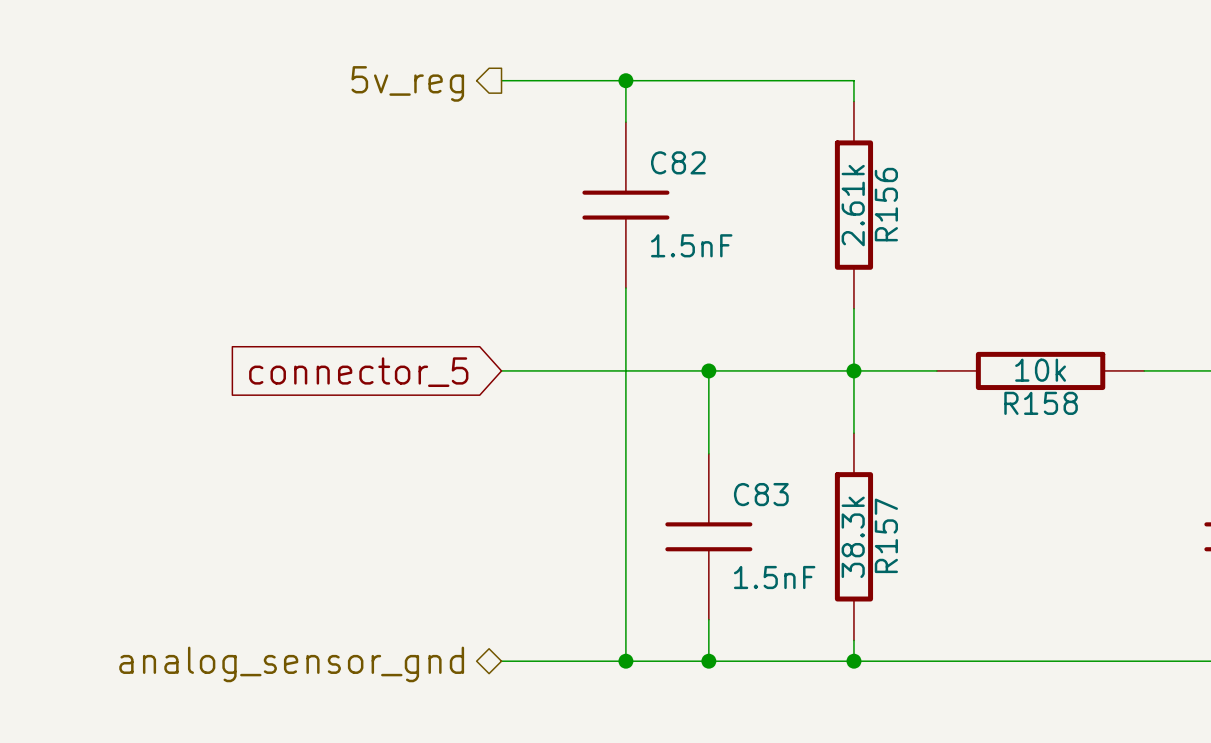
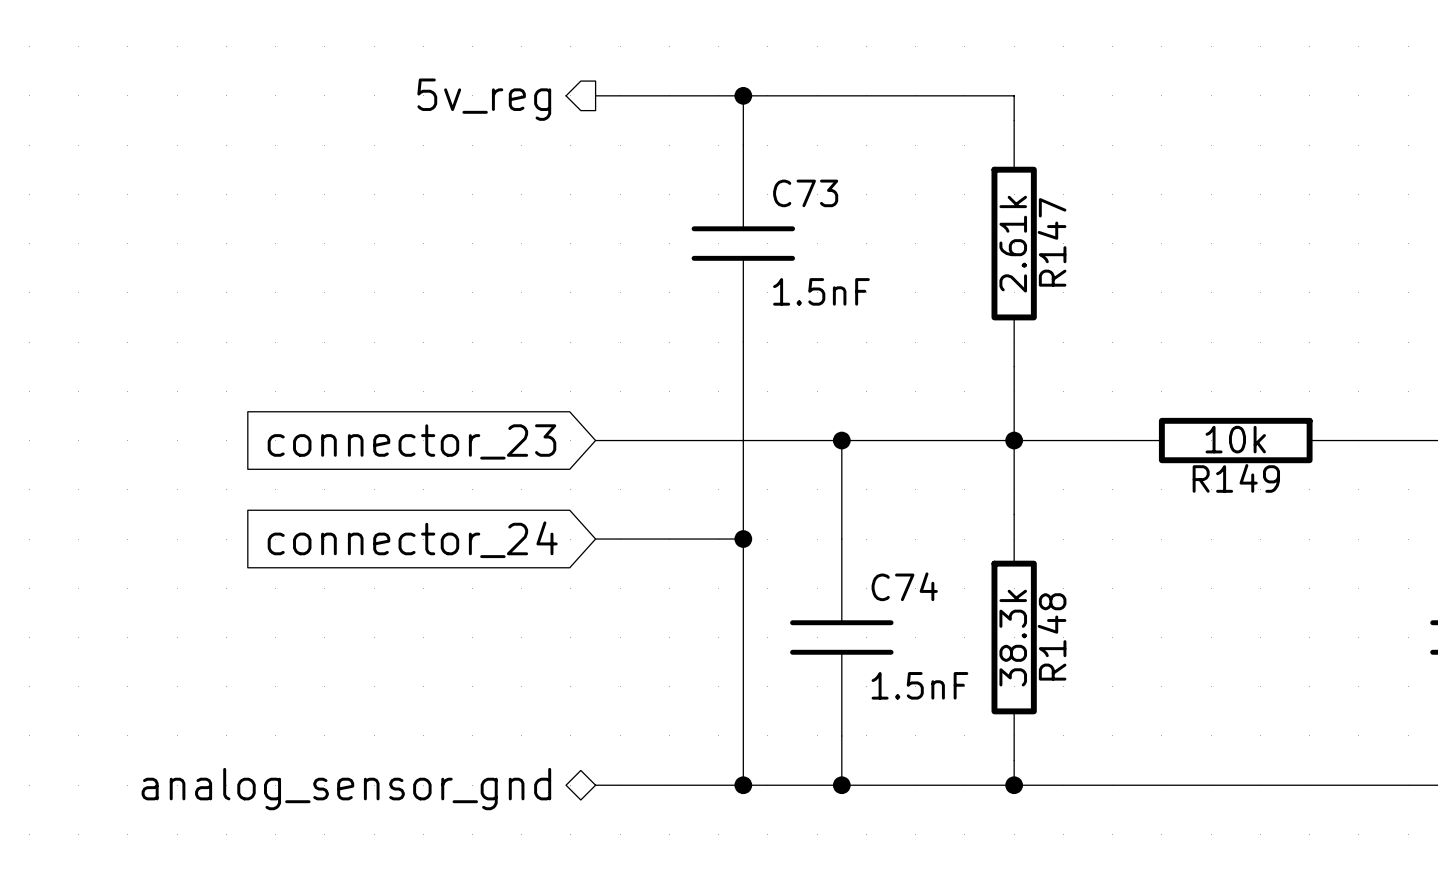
C82 name: C82 (678, 162) -> C73 (805, 193)
R156 name: R156 (886, 204) -> R147 (1052, 242)
global label: connector_5 (358, 372) -> connector_23 (411, 441)
R158 name: R158 (1041, 403) -> R149 (1236, 478)
wire: none -> (595, 539) (743, 539)
junction: none -> (743, 539)
global label: none -> connector_24 (412, 539)
C83 name: C83 (761, 494) -> C74 (904, 586)
R157 name: R157 (886, 535) -> R148 (1052, 636)

